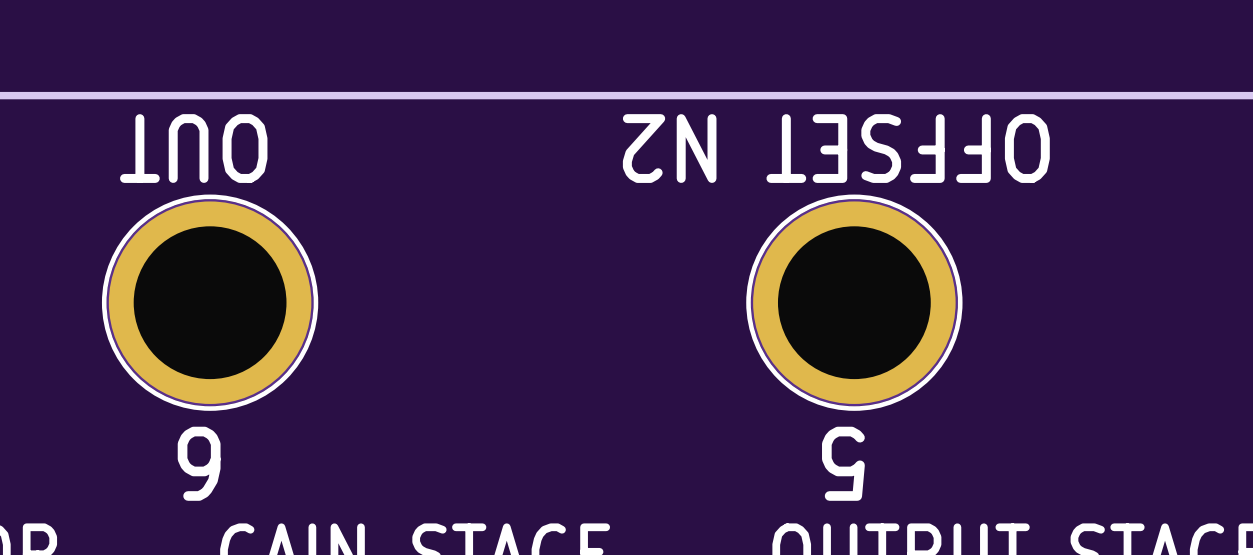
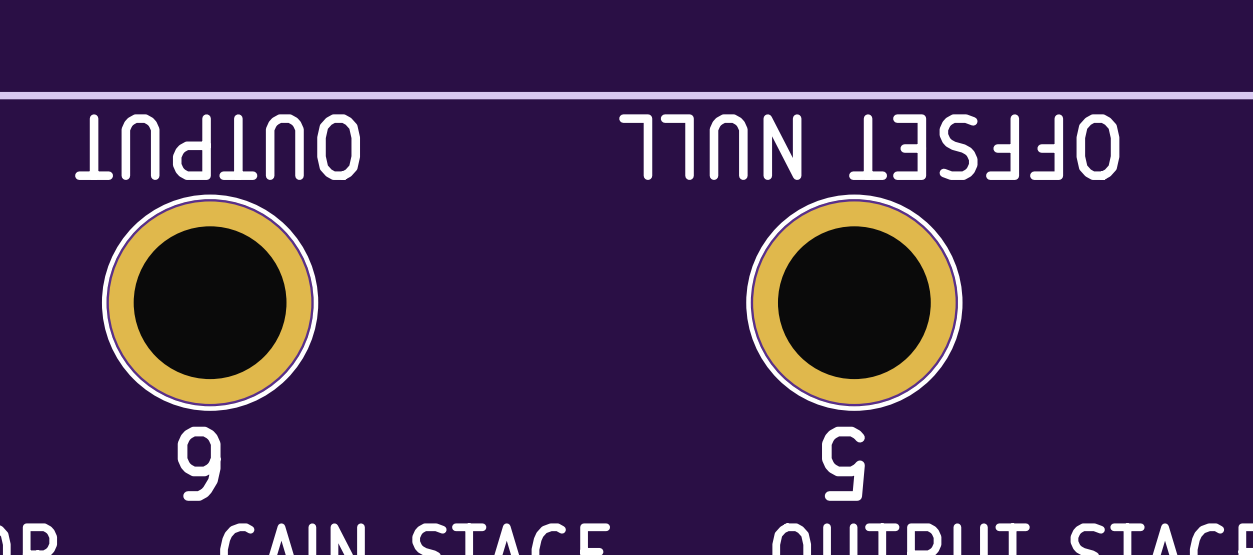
text: OUT (193, 148) -> OUTPUT (217, 147)
text: OFFSET N2 (836, 148) -> OFFSET NULL (869, 147)

